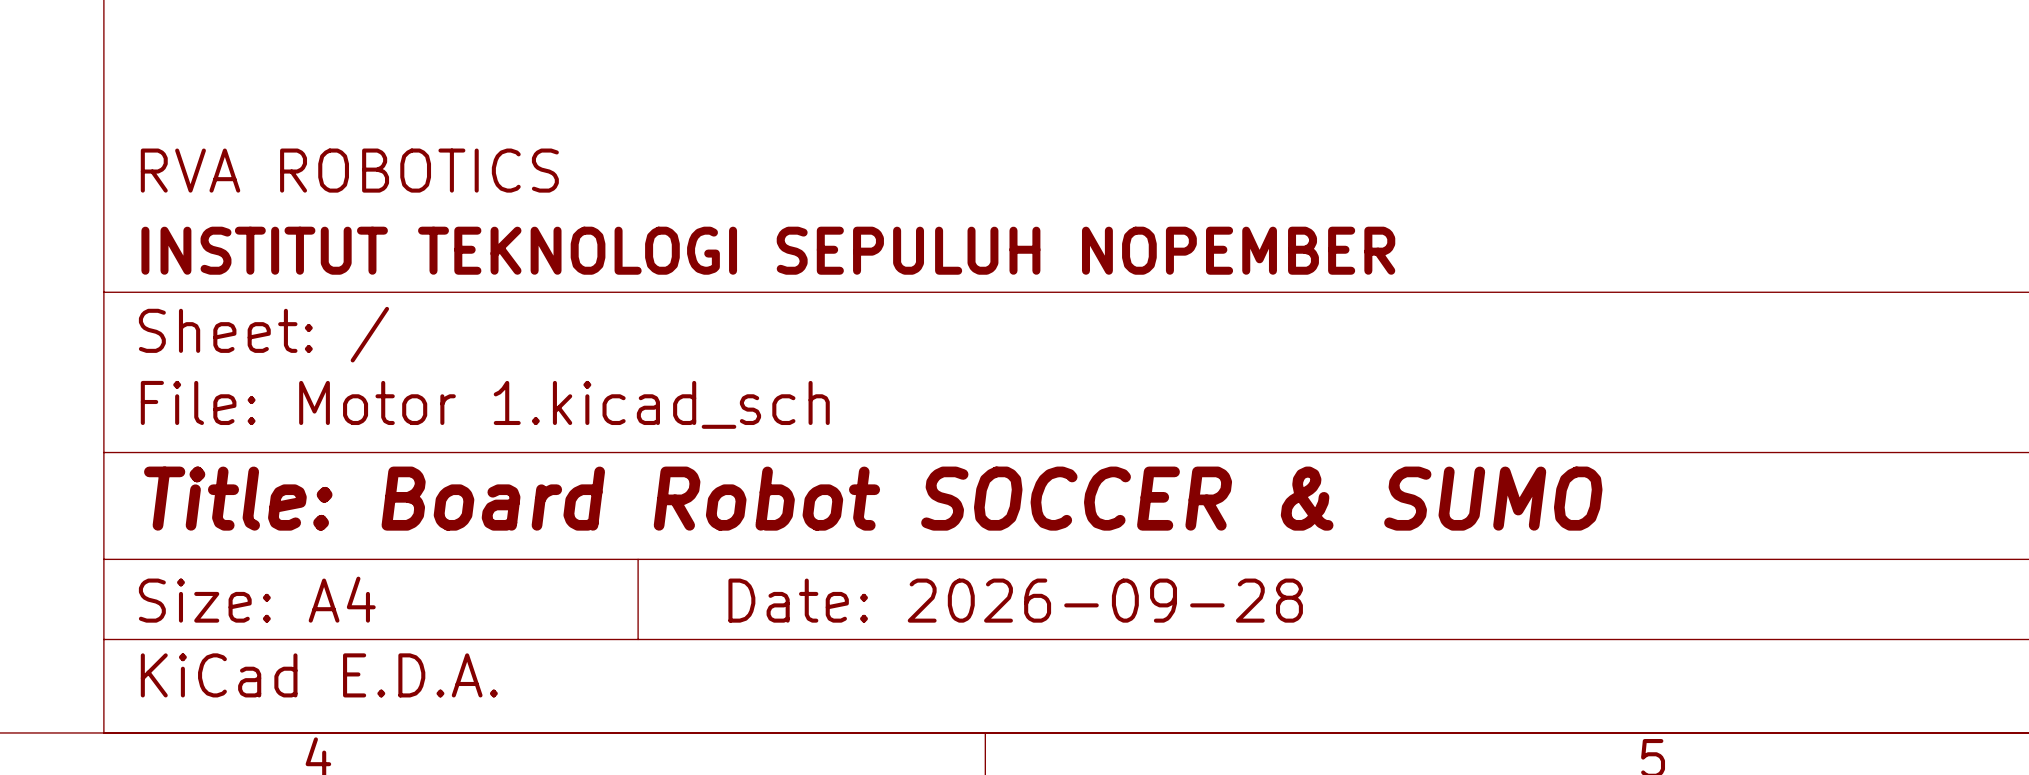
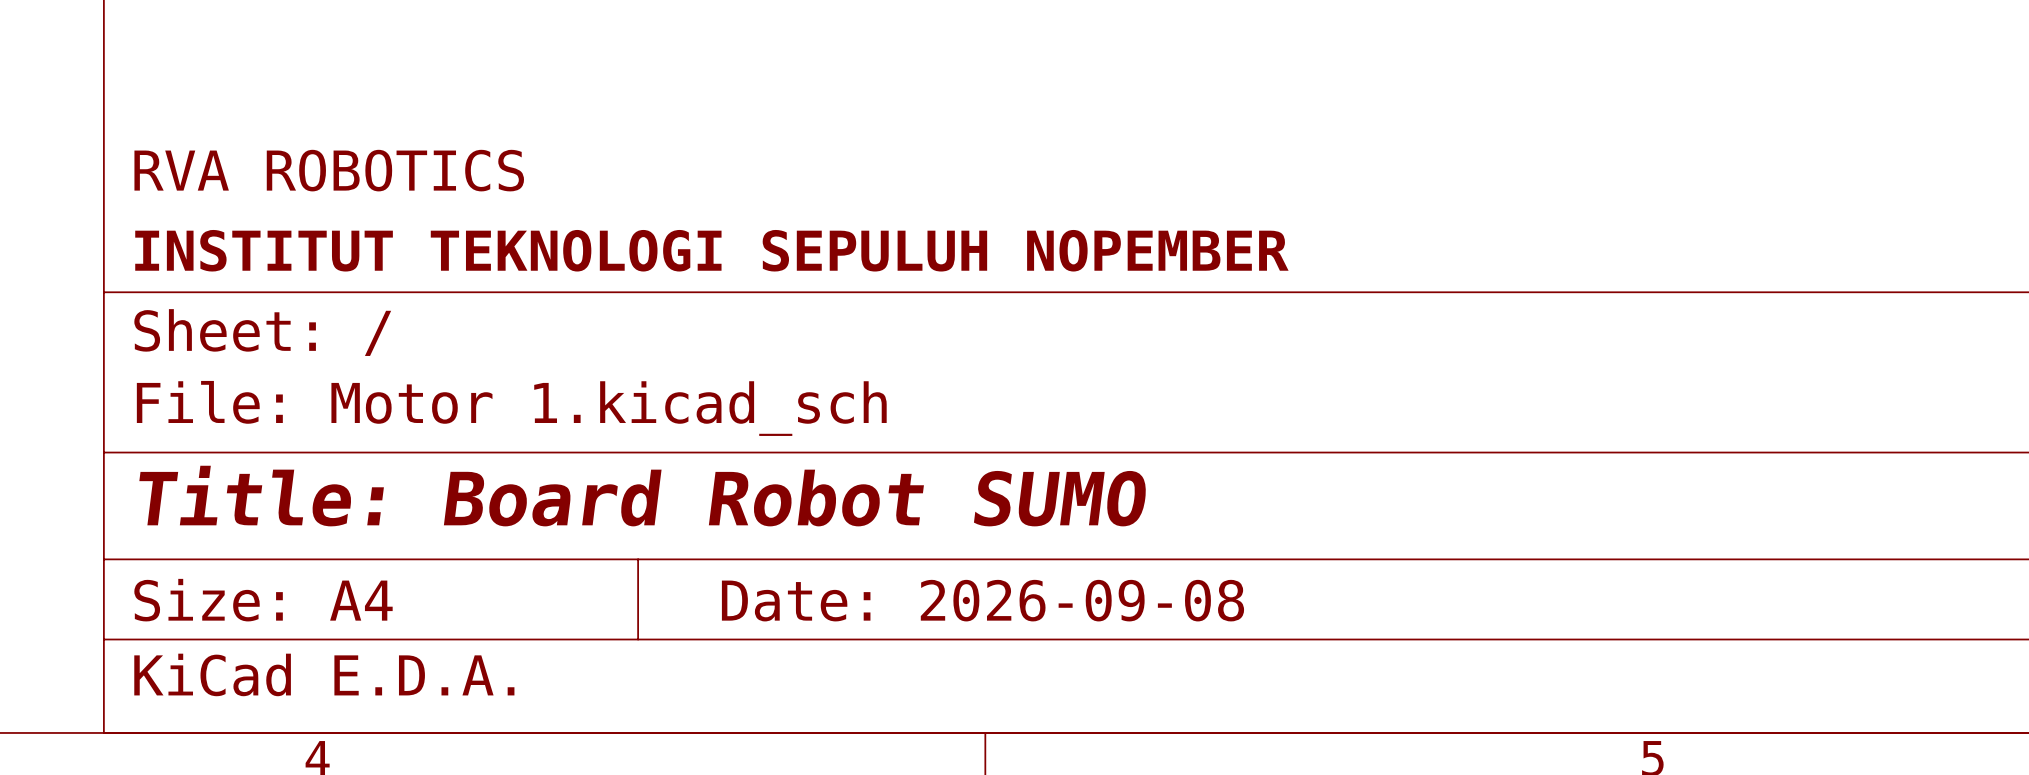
title block: Title: Board Robot SOCCER & SUMO (873, 498) -> Title: Board Robot SUMO (643, 496)
title block: Date: 2026-09-28 (1015, 600) -> Date: 2026-09-08 (982, 600)

